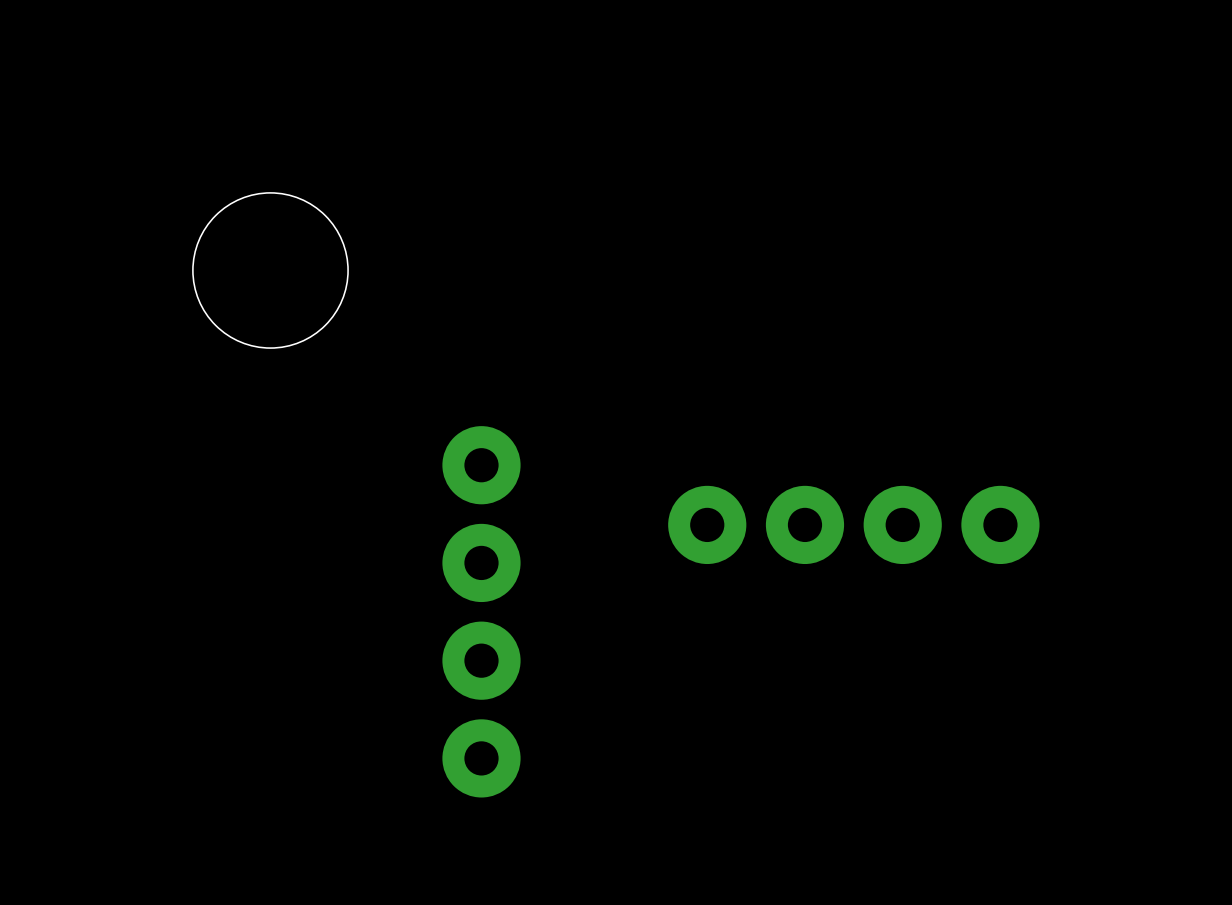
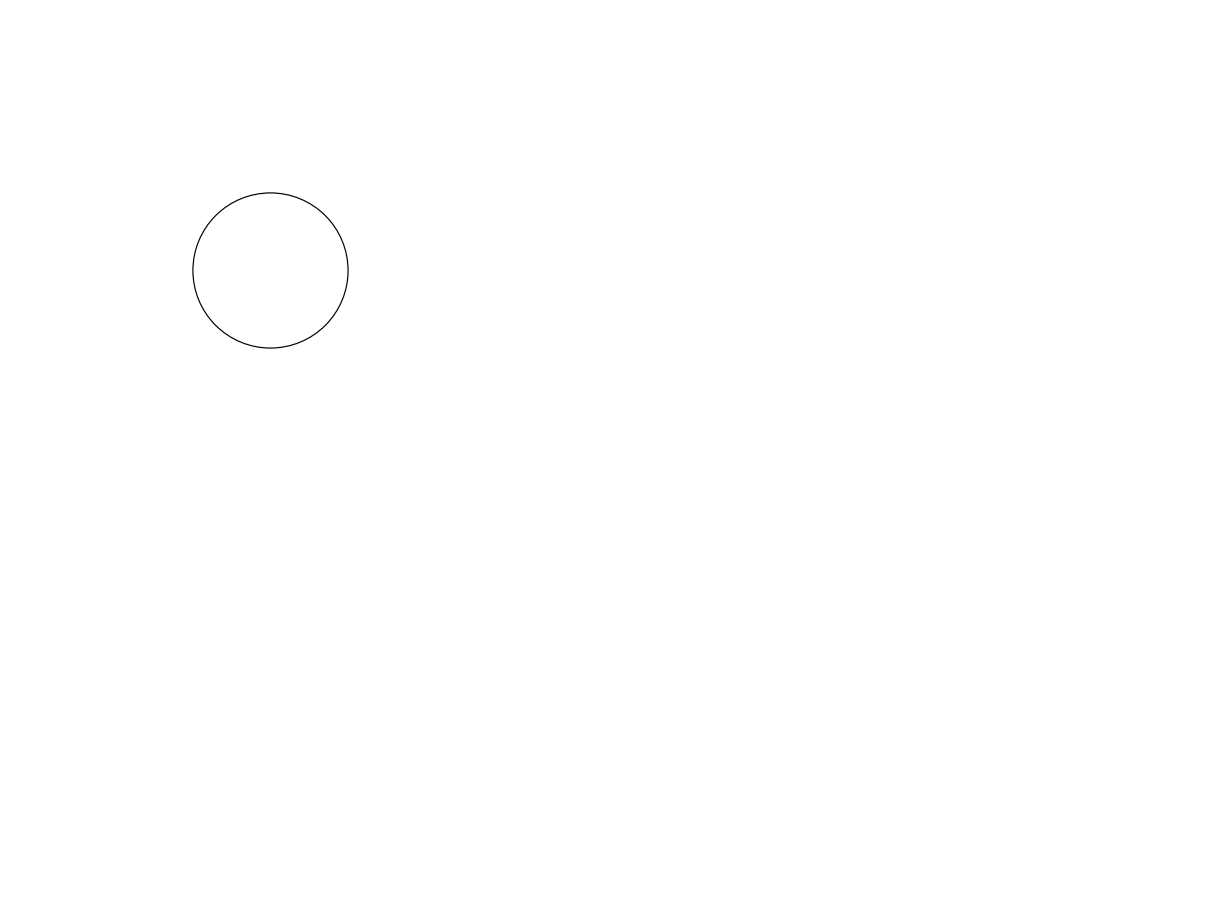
part: (853, 524) -> none
part: (481, 611) -> none

